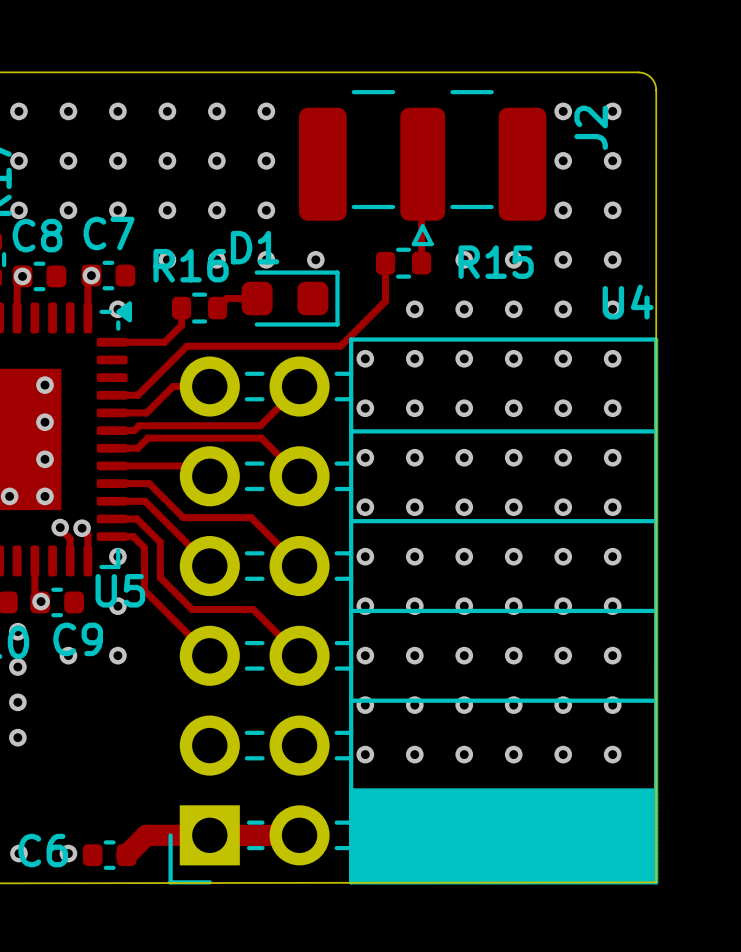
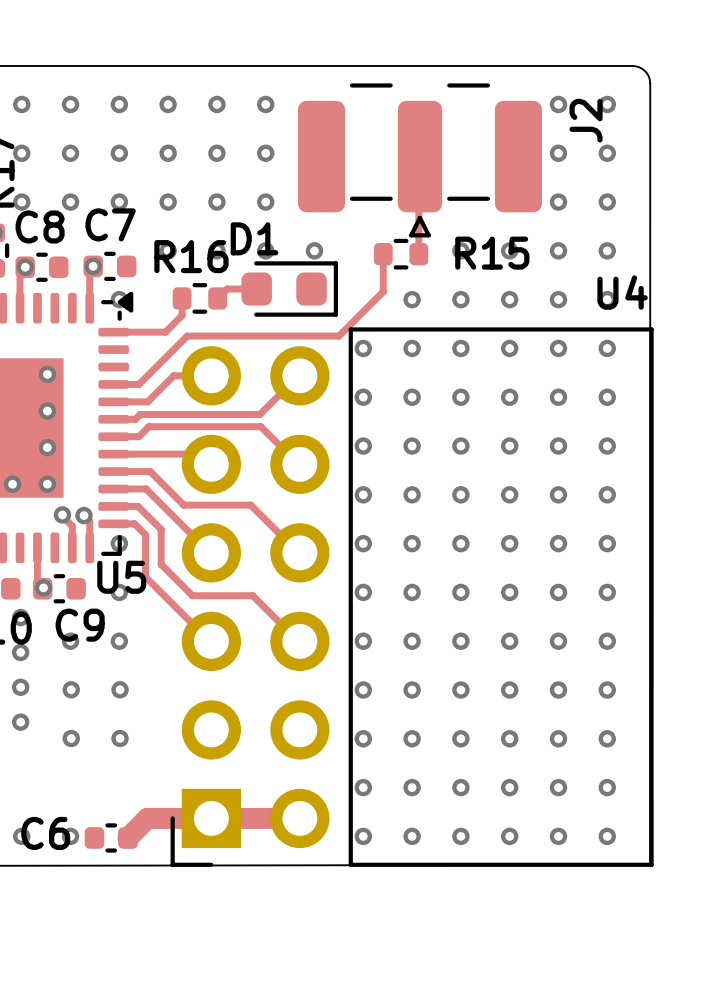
U4 footprint: [168, 337, 659, 885] -> [170, 327, 654, 867]
via: none -> (71, 689)
via: none -> (120, 689)
via: none -> (71, 738)
via: none -> (120, 738)

